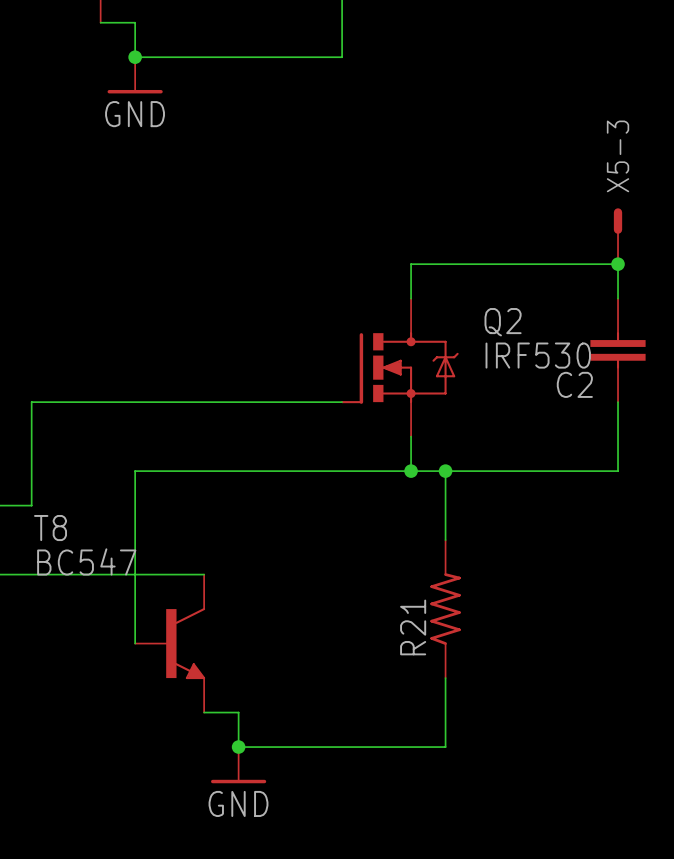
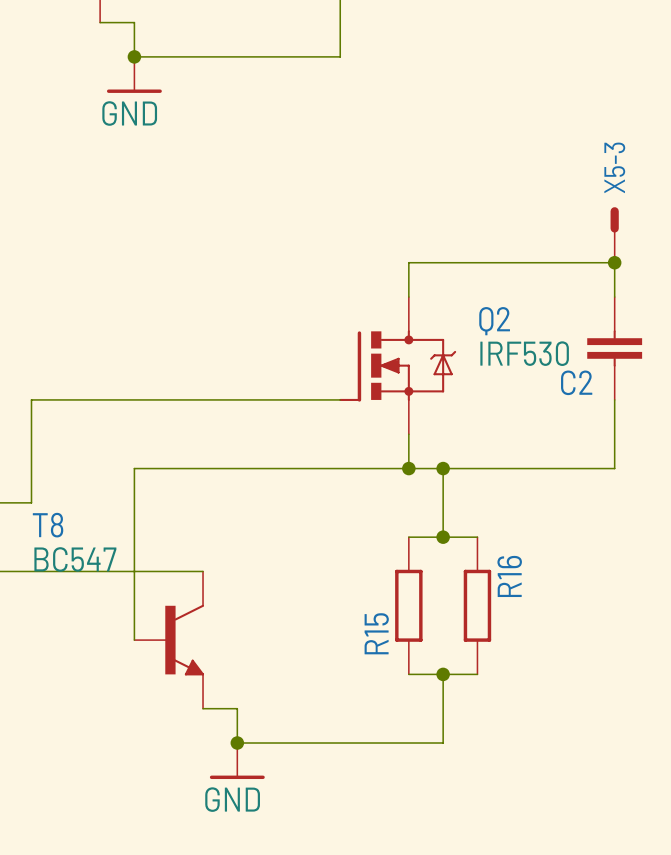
wire: none -> (408, 537) (477, 537)
junction: none -> (443, 537)
R15: none -> (408, 605)
R21: (445, 609) -> none
R16: none -> (477, 605)
wire: none -> (408, 674) (477, 674)
junction: none -> (443, 674)

